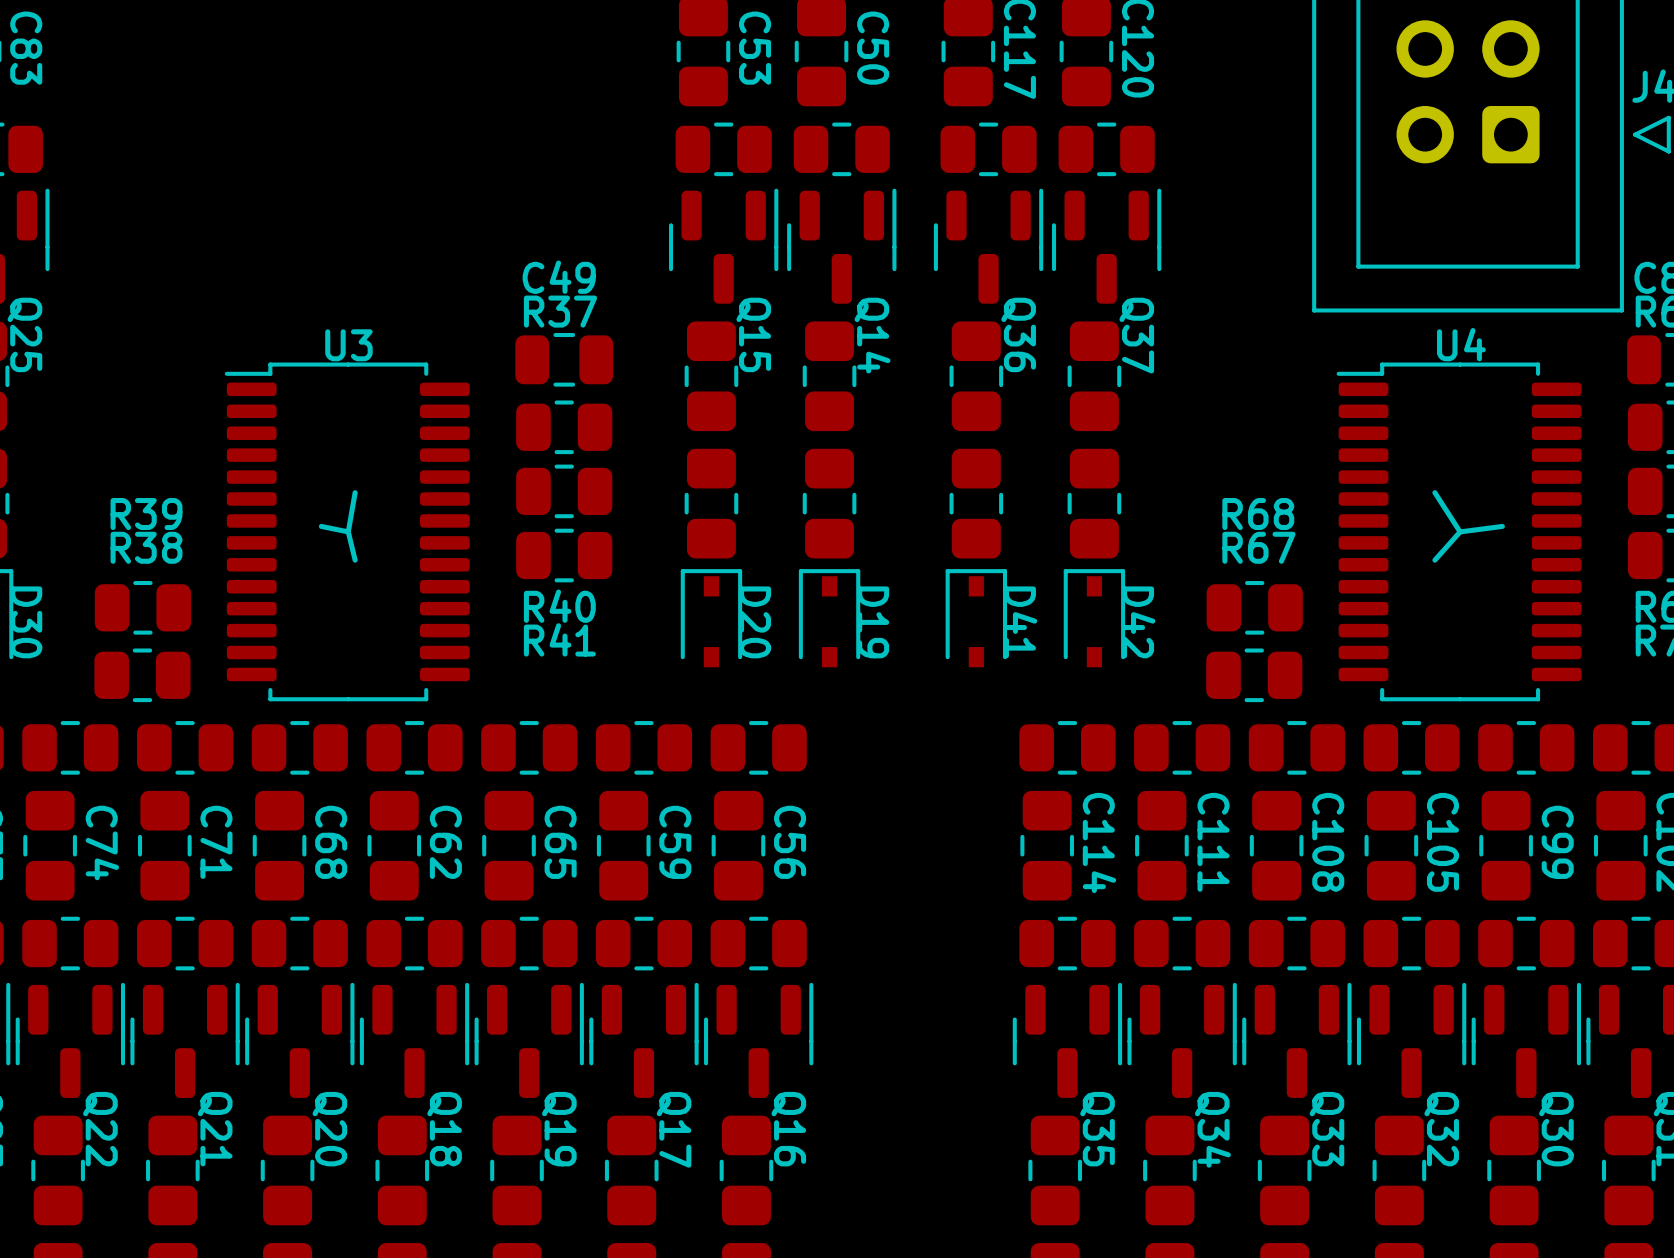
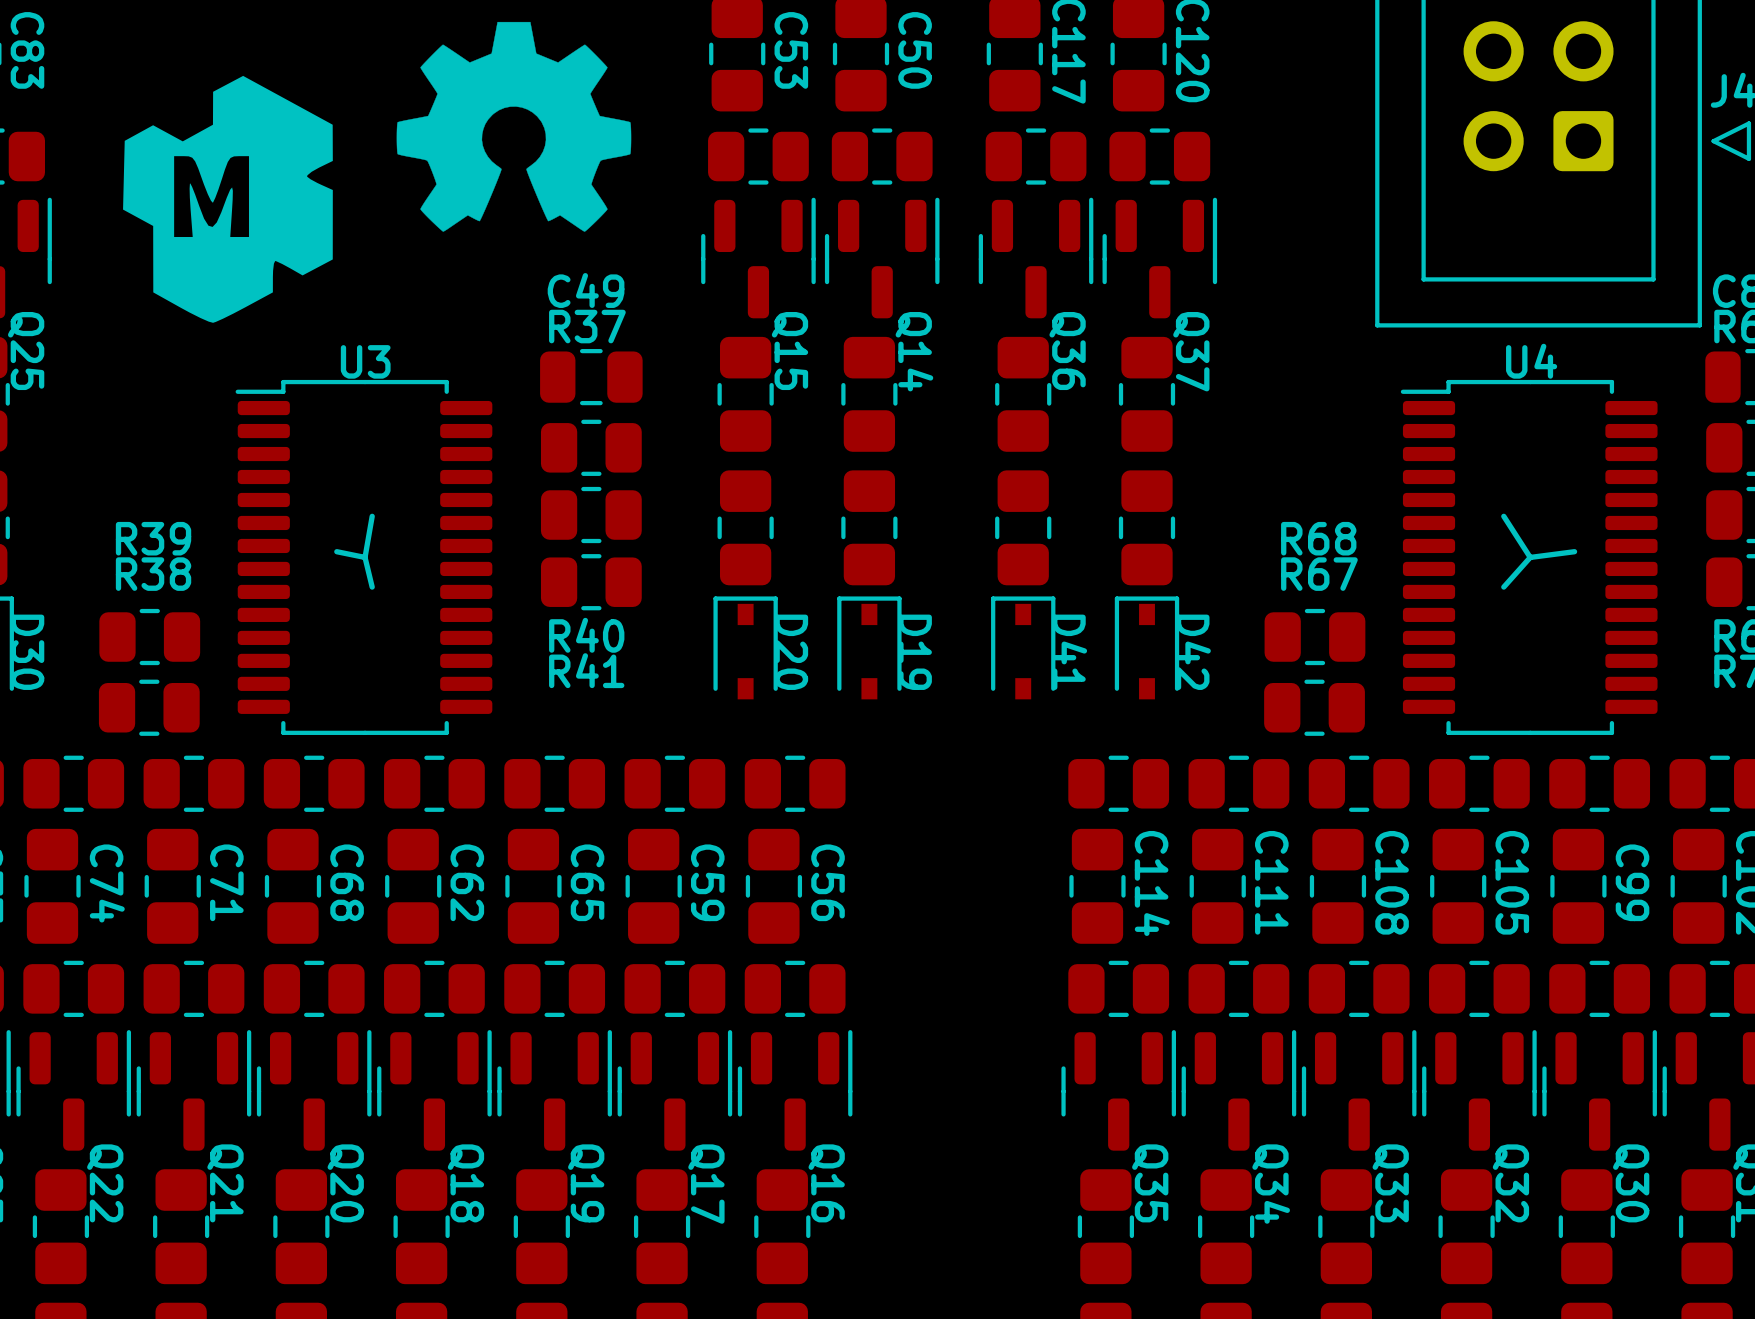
drawing: none -> [396, 21, 632, 232]
drawing: none -> [123, 75, 333, 323]

